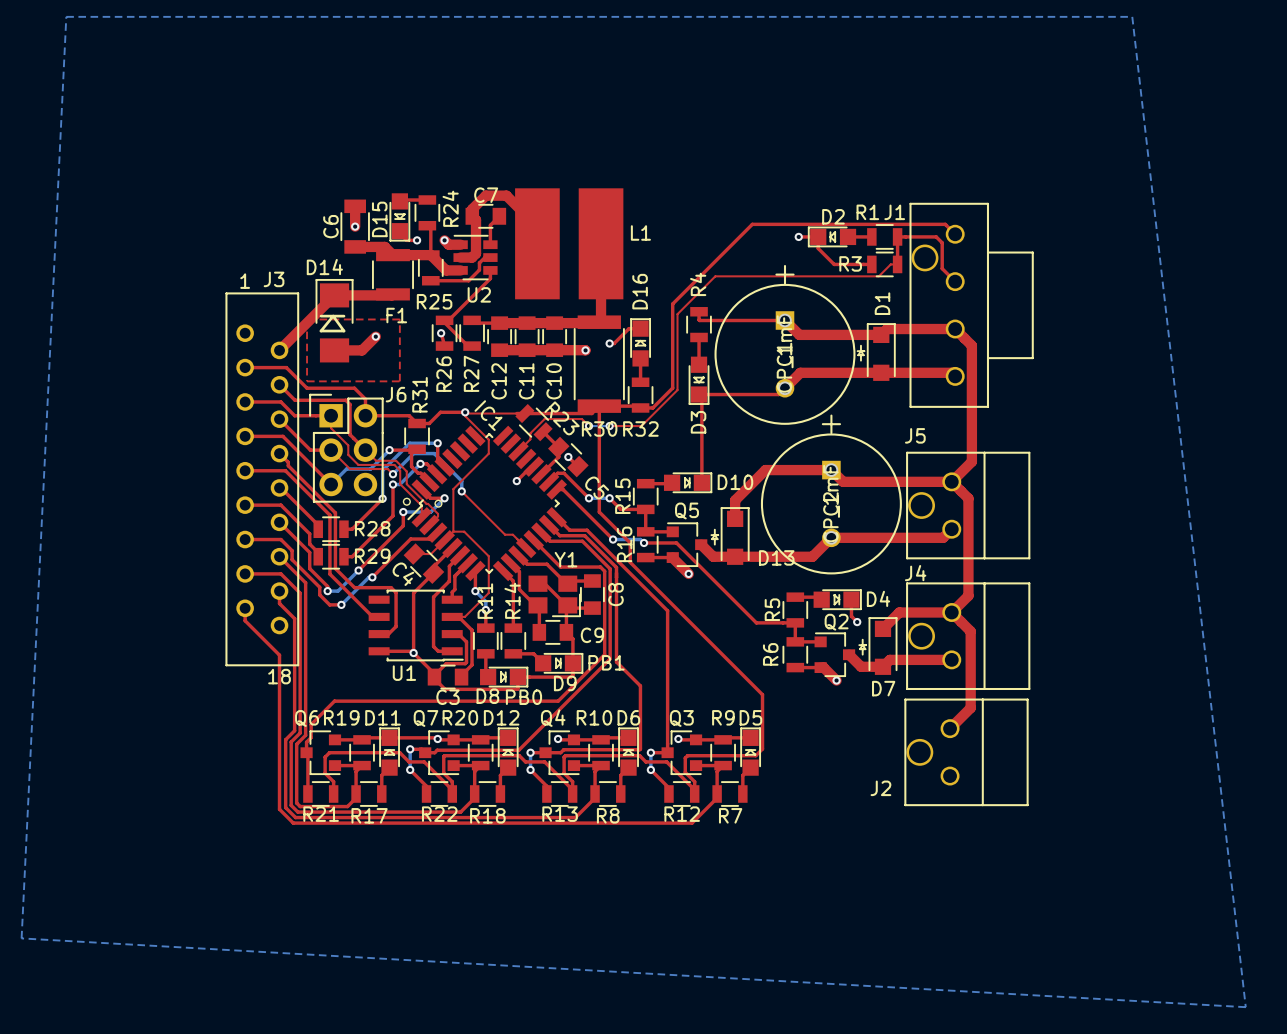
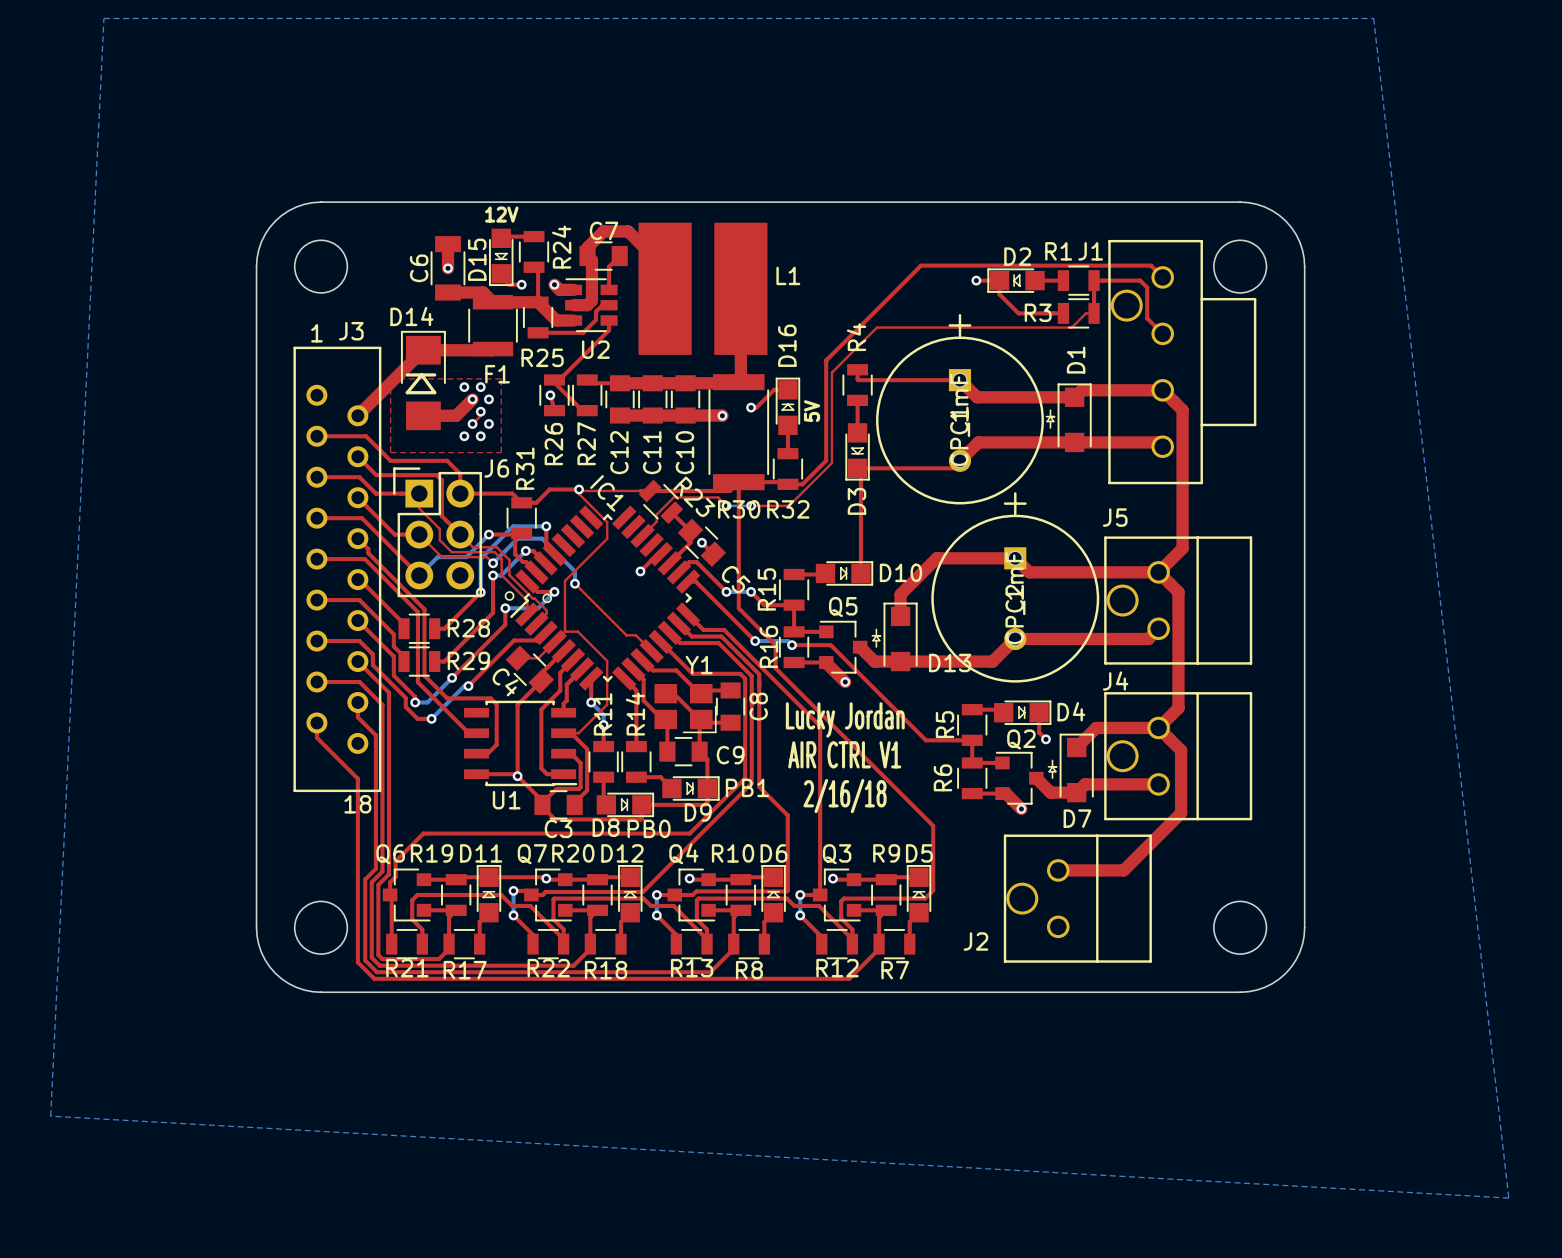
board edge: none -> (321, 202) (1240, 202) (1264, 207) (1279, 215) (1296, 234) (1302, 249) (1304, 266) (1304, 927) (1299, 952) (1291, 967) (1279, 978) (1264, 987) (1240, 992) (321, 992) (296, 987) (281, 978) (265, 960) (258, 944) (256, 927) (256, 266) (261, 241) (275, 221) (296, 207) (321, 202)
text: none -> 12V (501, 214)
round board edge: none -> [293, 239, 349, 294]
round board edge: none -> [1213, 239, 1268, 294]
via: none -> (464, 387)
via: none -> (480, 387)
via: none -> (488, 399)
top track: none -> (480, 411) (480, 415) (472, 423)
via: none -> (480, 411)
text: none -> 5V (812, 411)
via: none -> (472, 423)
via: none -> (488, 423)
via: none -> (464, 436)
via: none -> (480, 436)
text: none -> Lucky Jordan (845, 719)
text: none -> AIR CTRL V1 (844, 754)
text: none -> 2/16/18 (845, 796)
top track: (970, 683) (970, 708) (950, 728) -> (1181, 813) (1123, 870) (1058, 870)
J2 position: (966, 752) -> (1077, 898)
round board edge: none -> [293, 900, 349, 955]
round board edge: none -> [1213, 900, 1268, 955]

